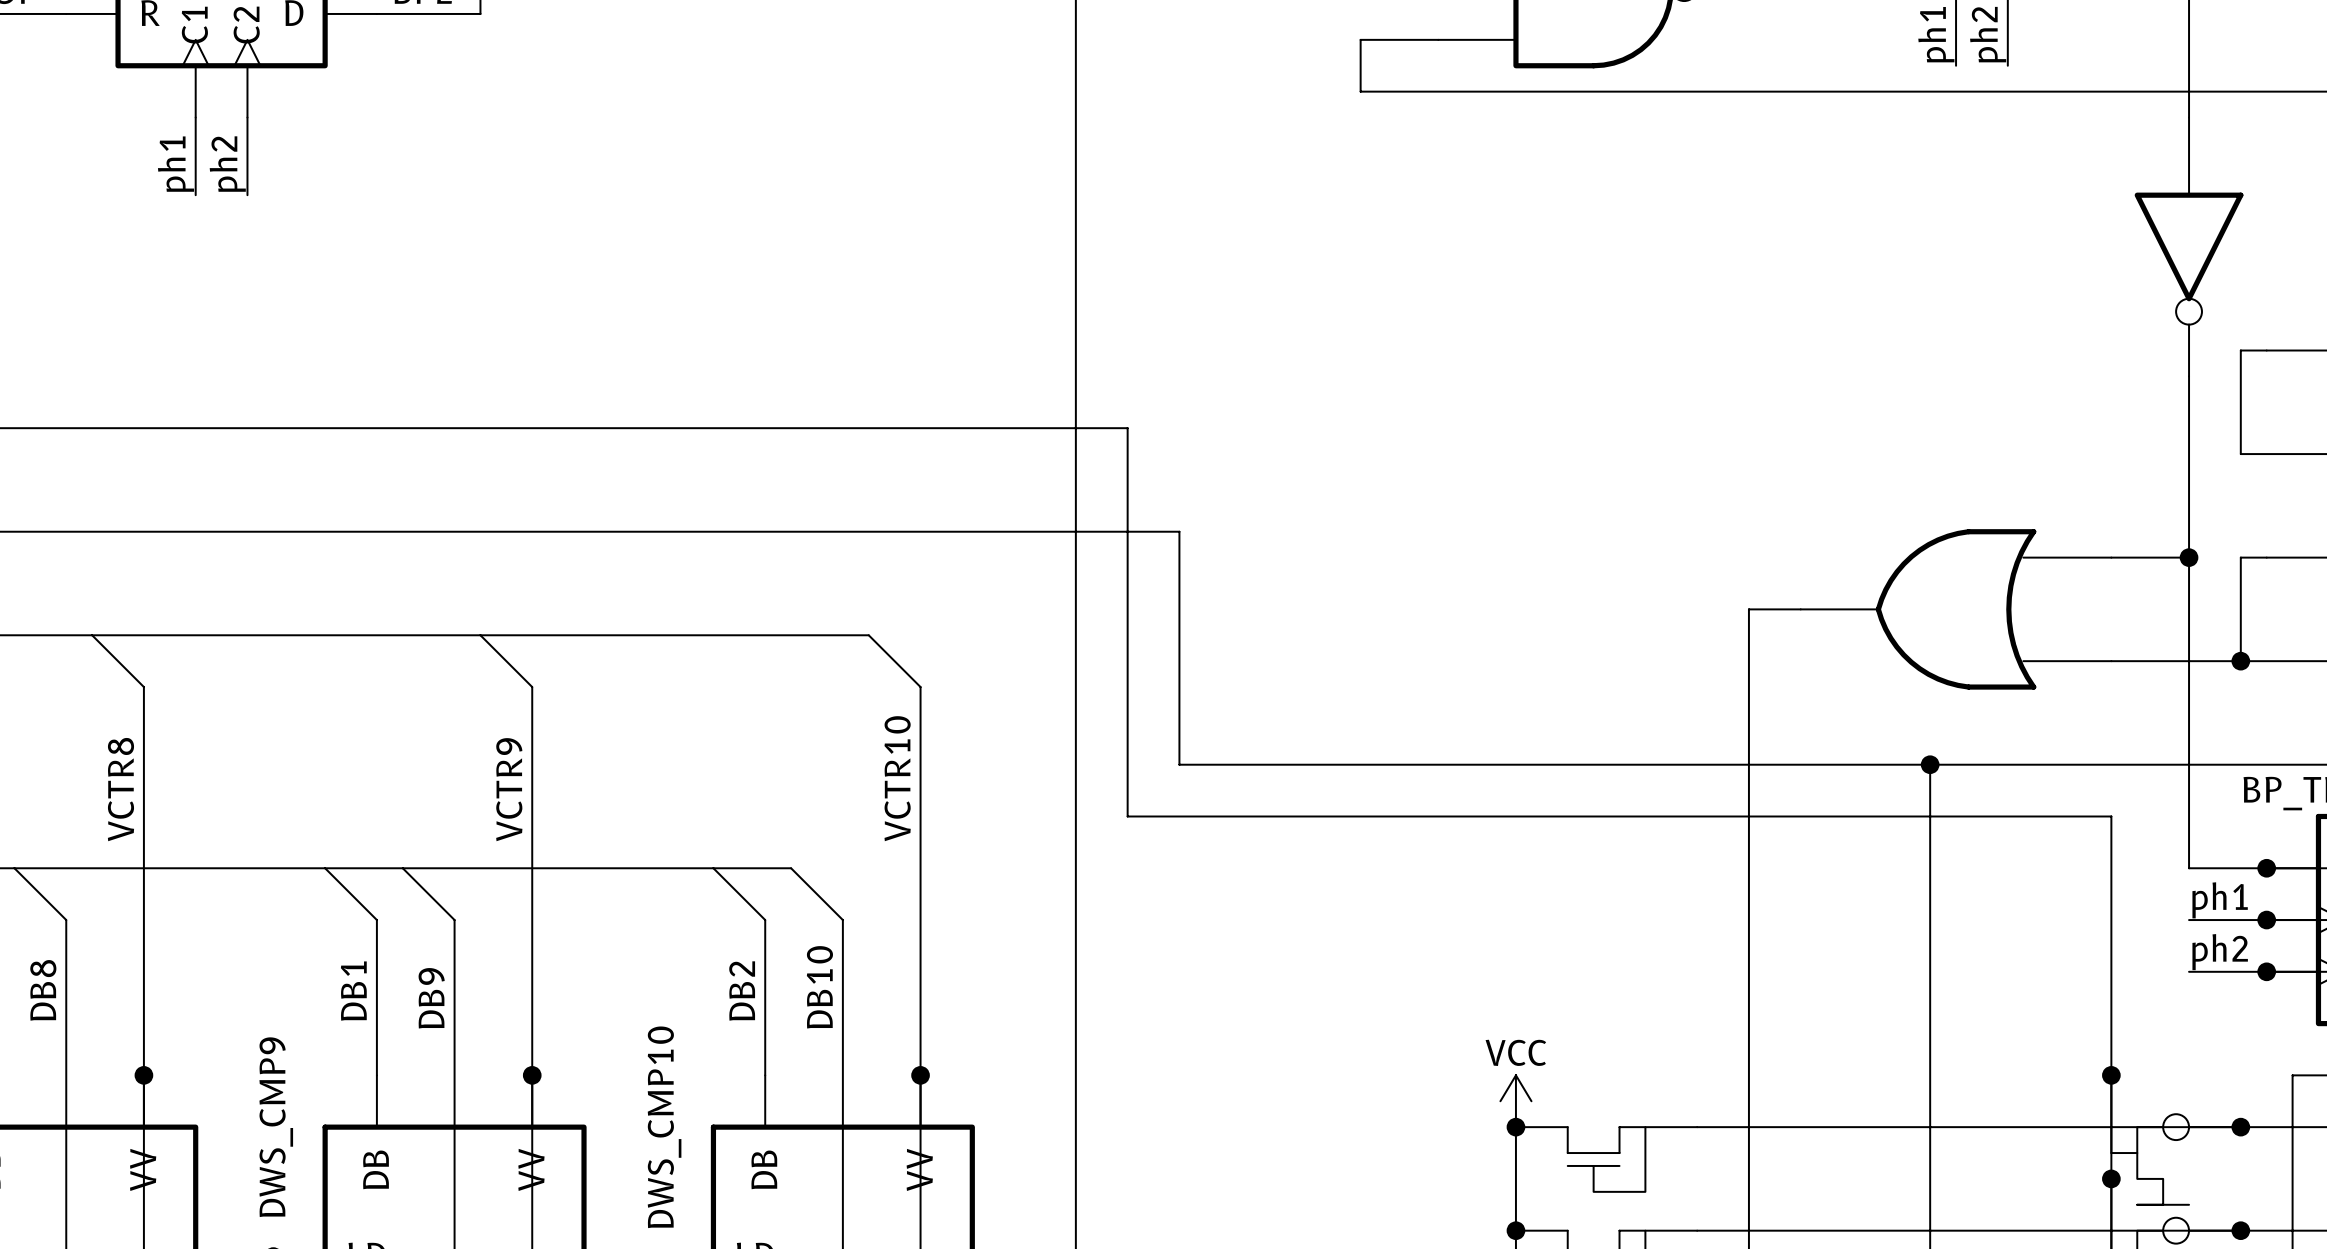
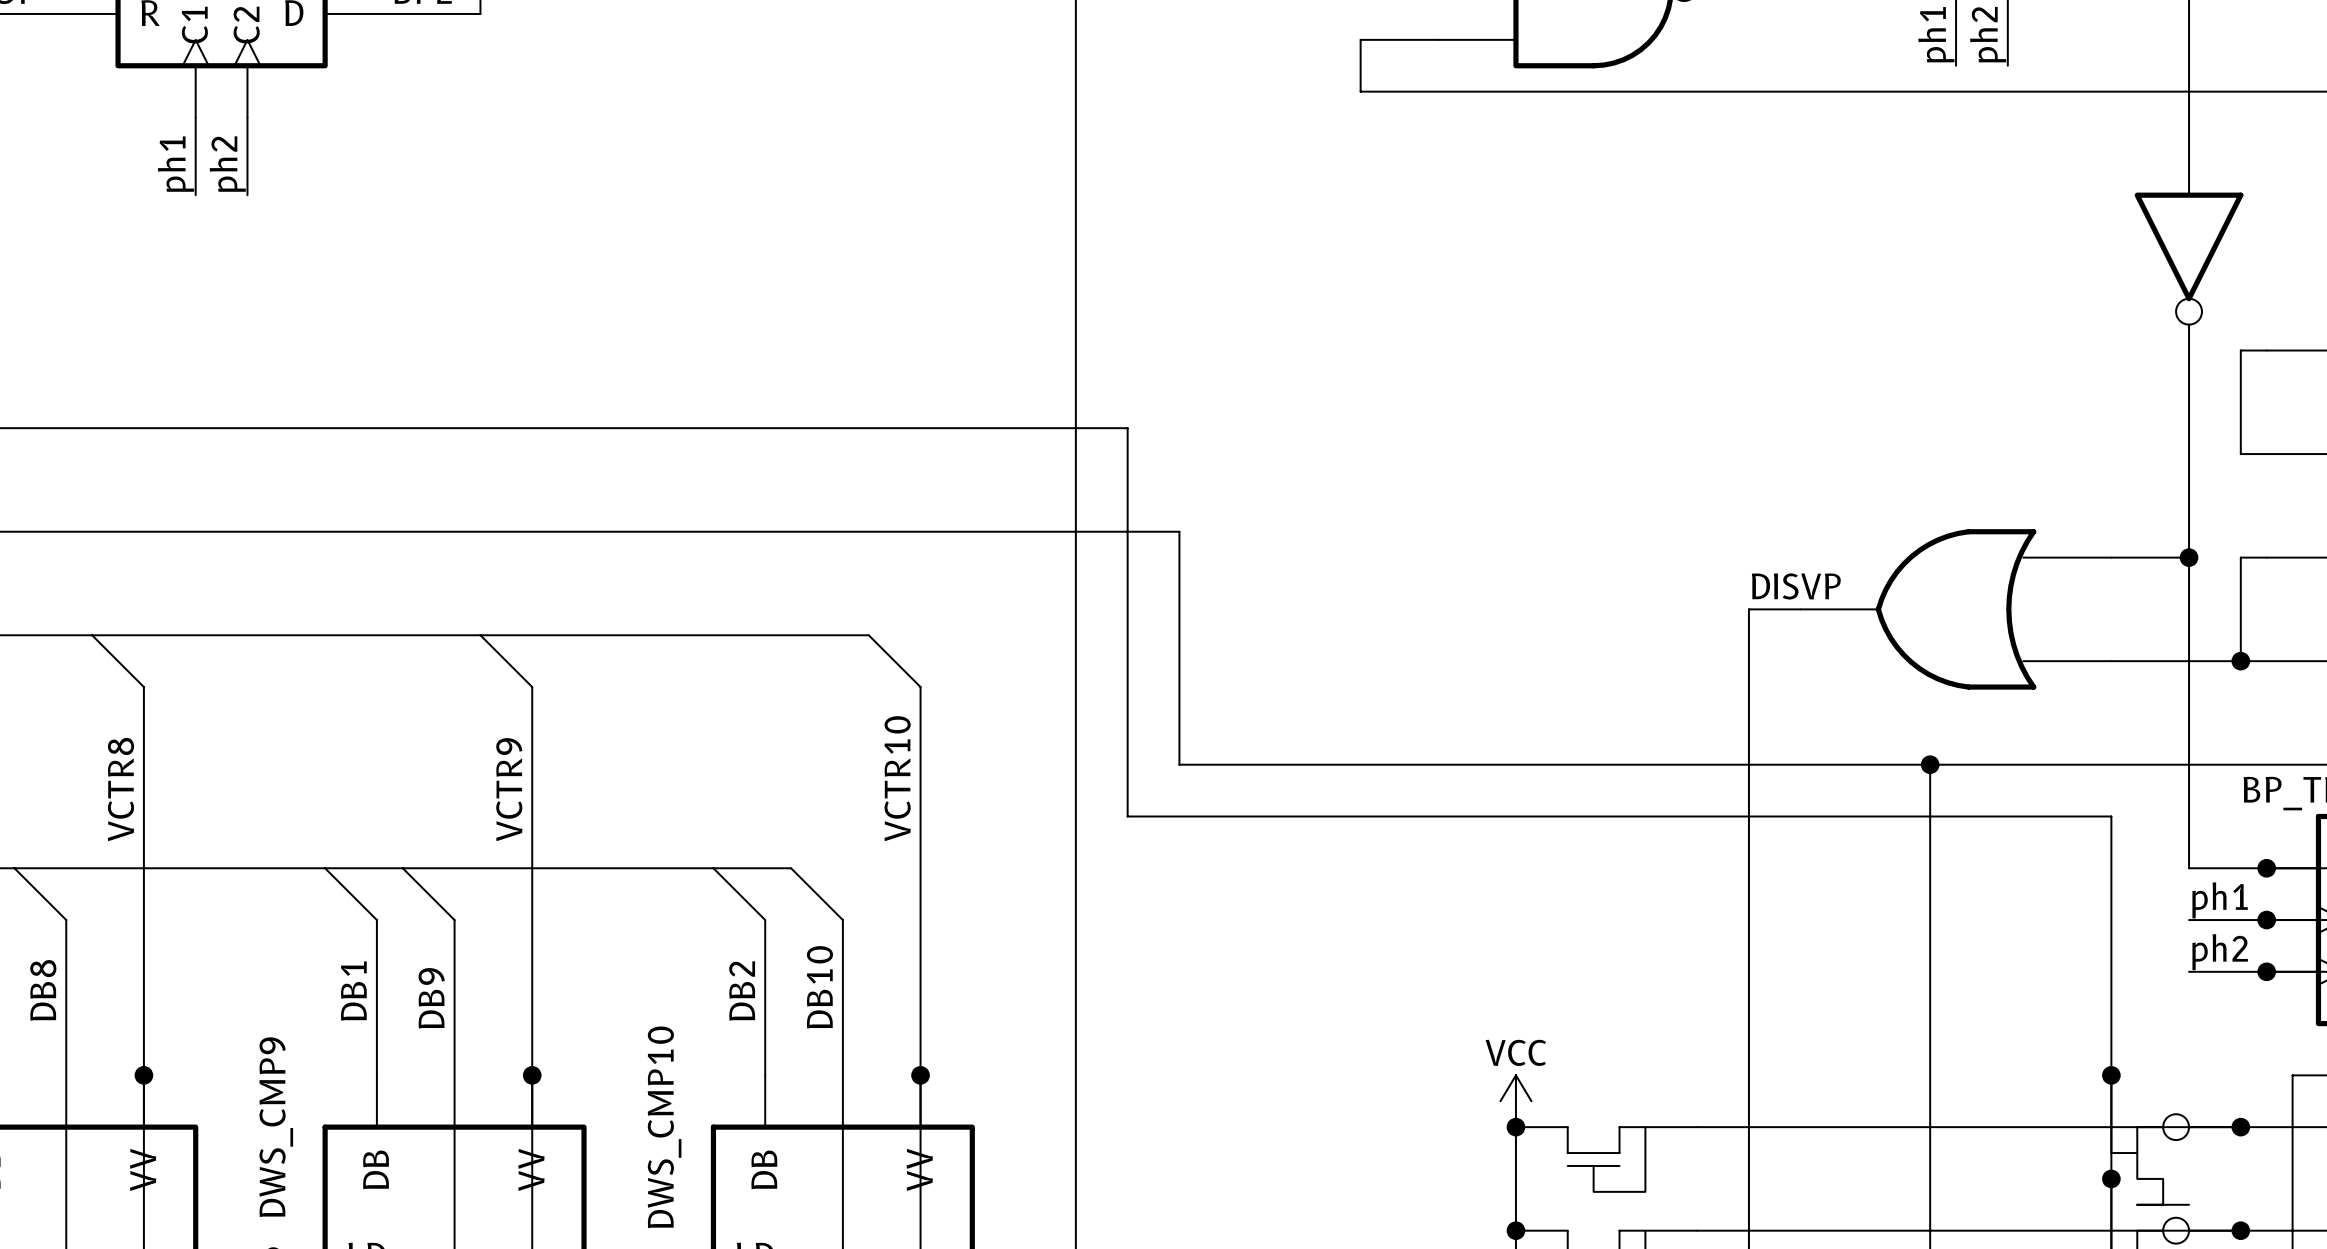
label: none -> DISVP (1796, 586)

